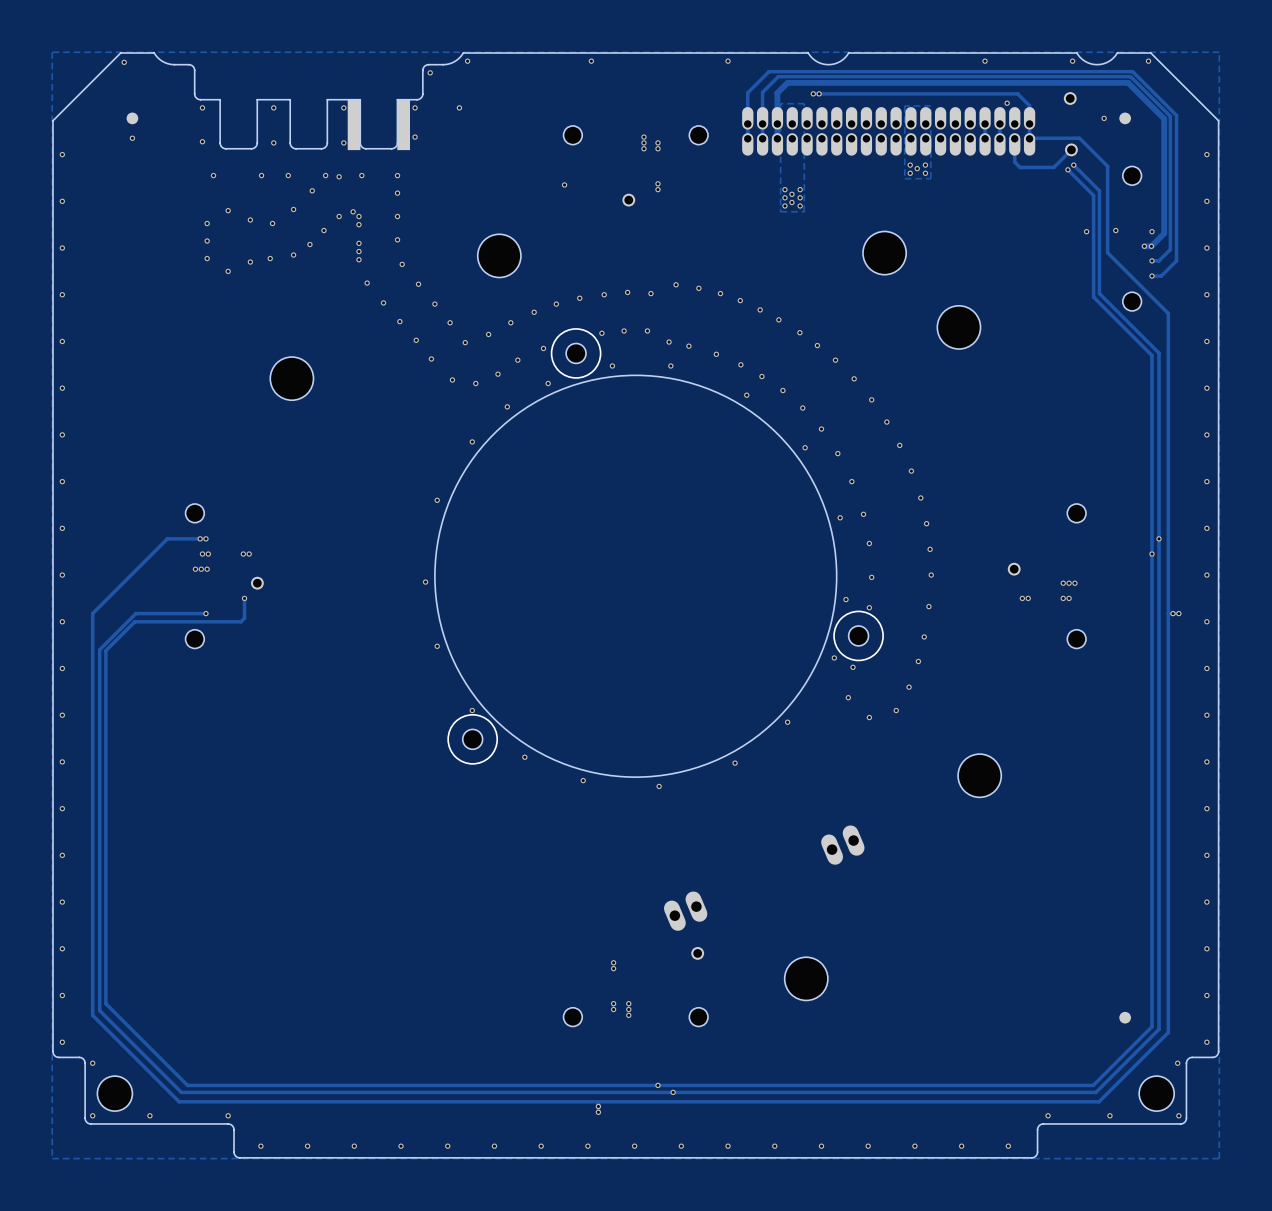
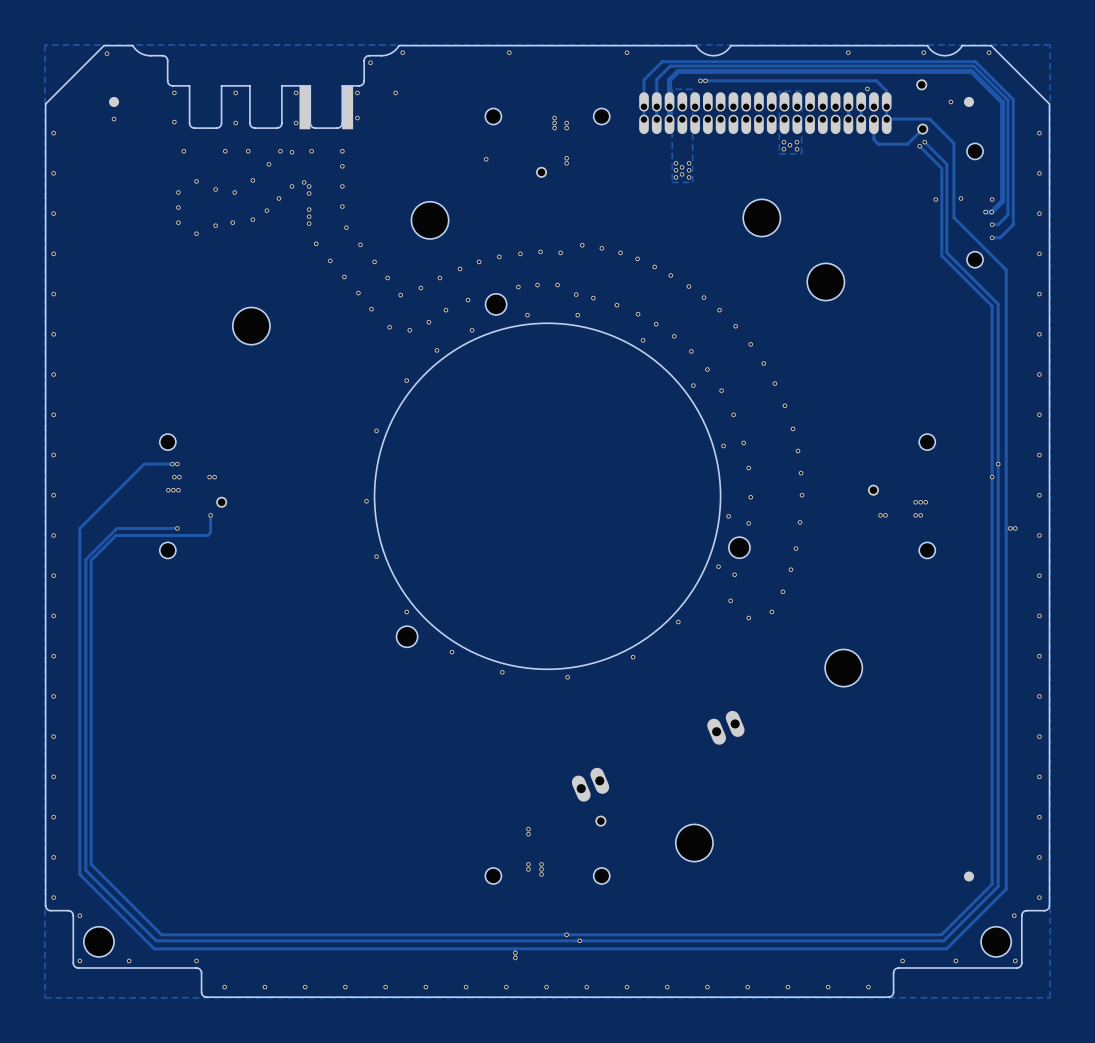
part footprint: [550, 328, 602, 379] -> [485, 293, 507, 315]
part footprint: [833, 610, 884, 662] -> [728, 537, 751, 559]
part footprint: [447, 714, 498, 765] -> [396, 626, 418, 648]

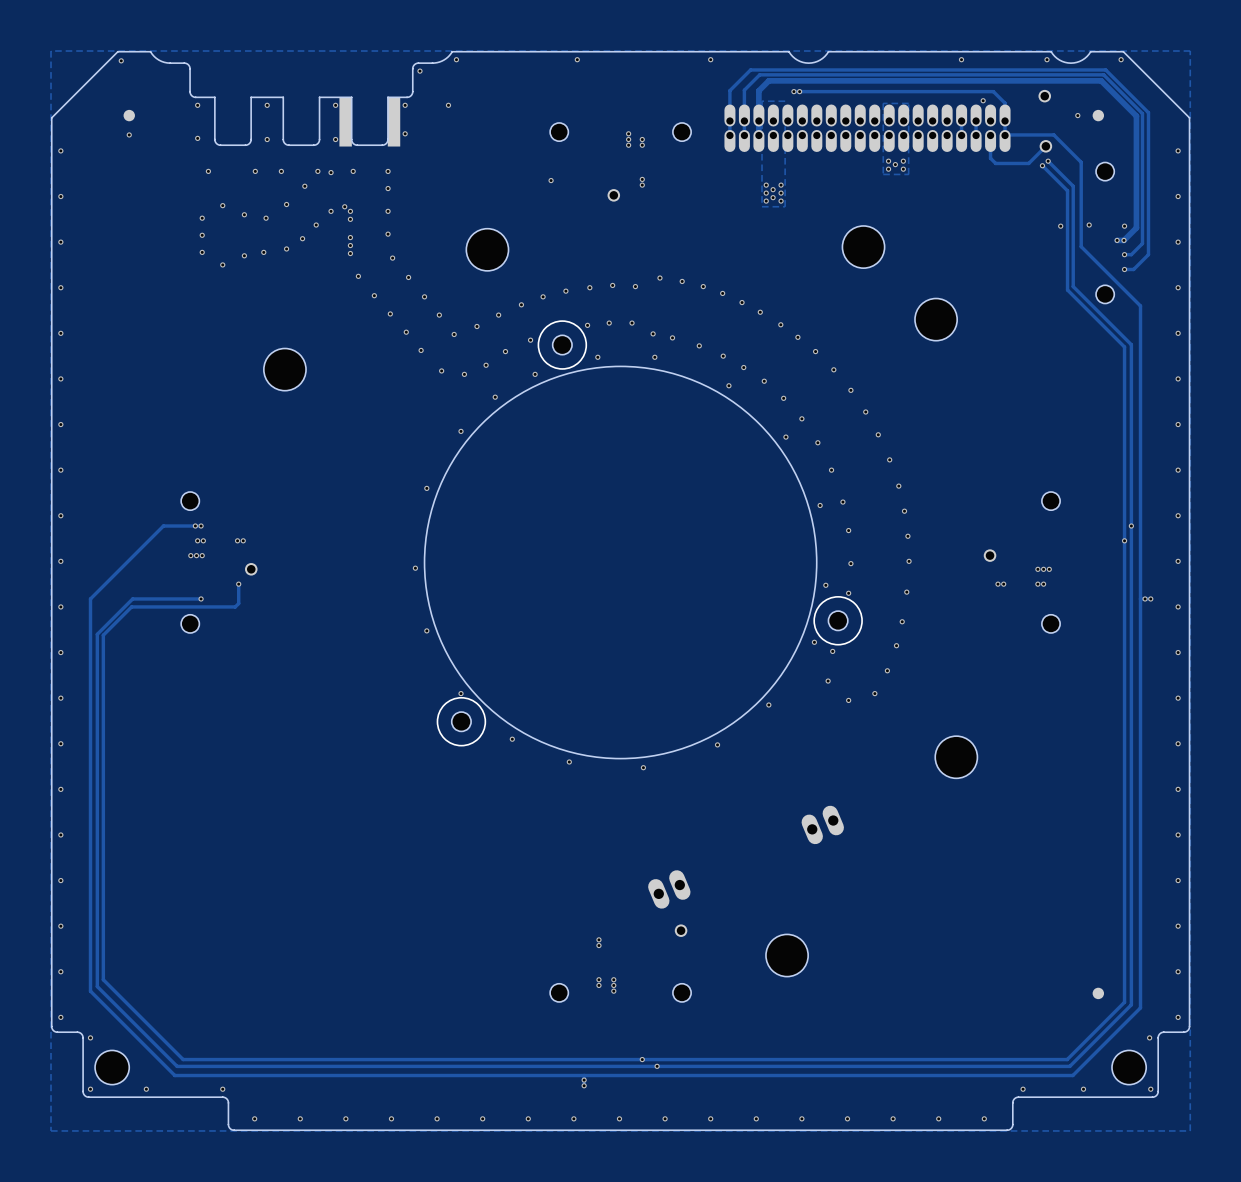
part footprint: [485, 293, 507, 315] -> [537, 320, 588, 370]
part footprint: [728, 537, 751, 559] -> [813, 596, 863, 646]
part footprint: [396, 626, 418, 648] -> [436, 697, 487, 747]

